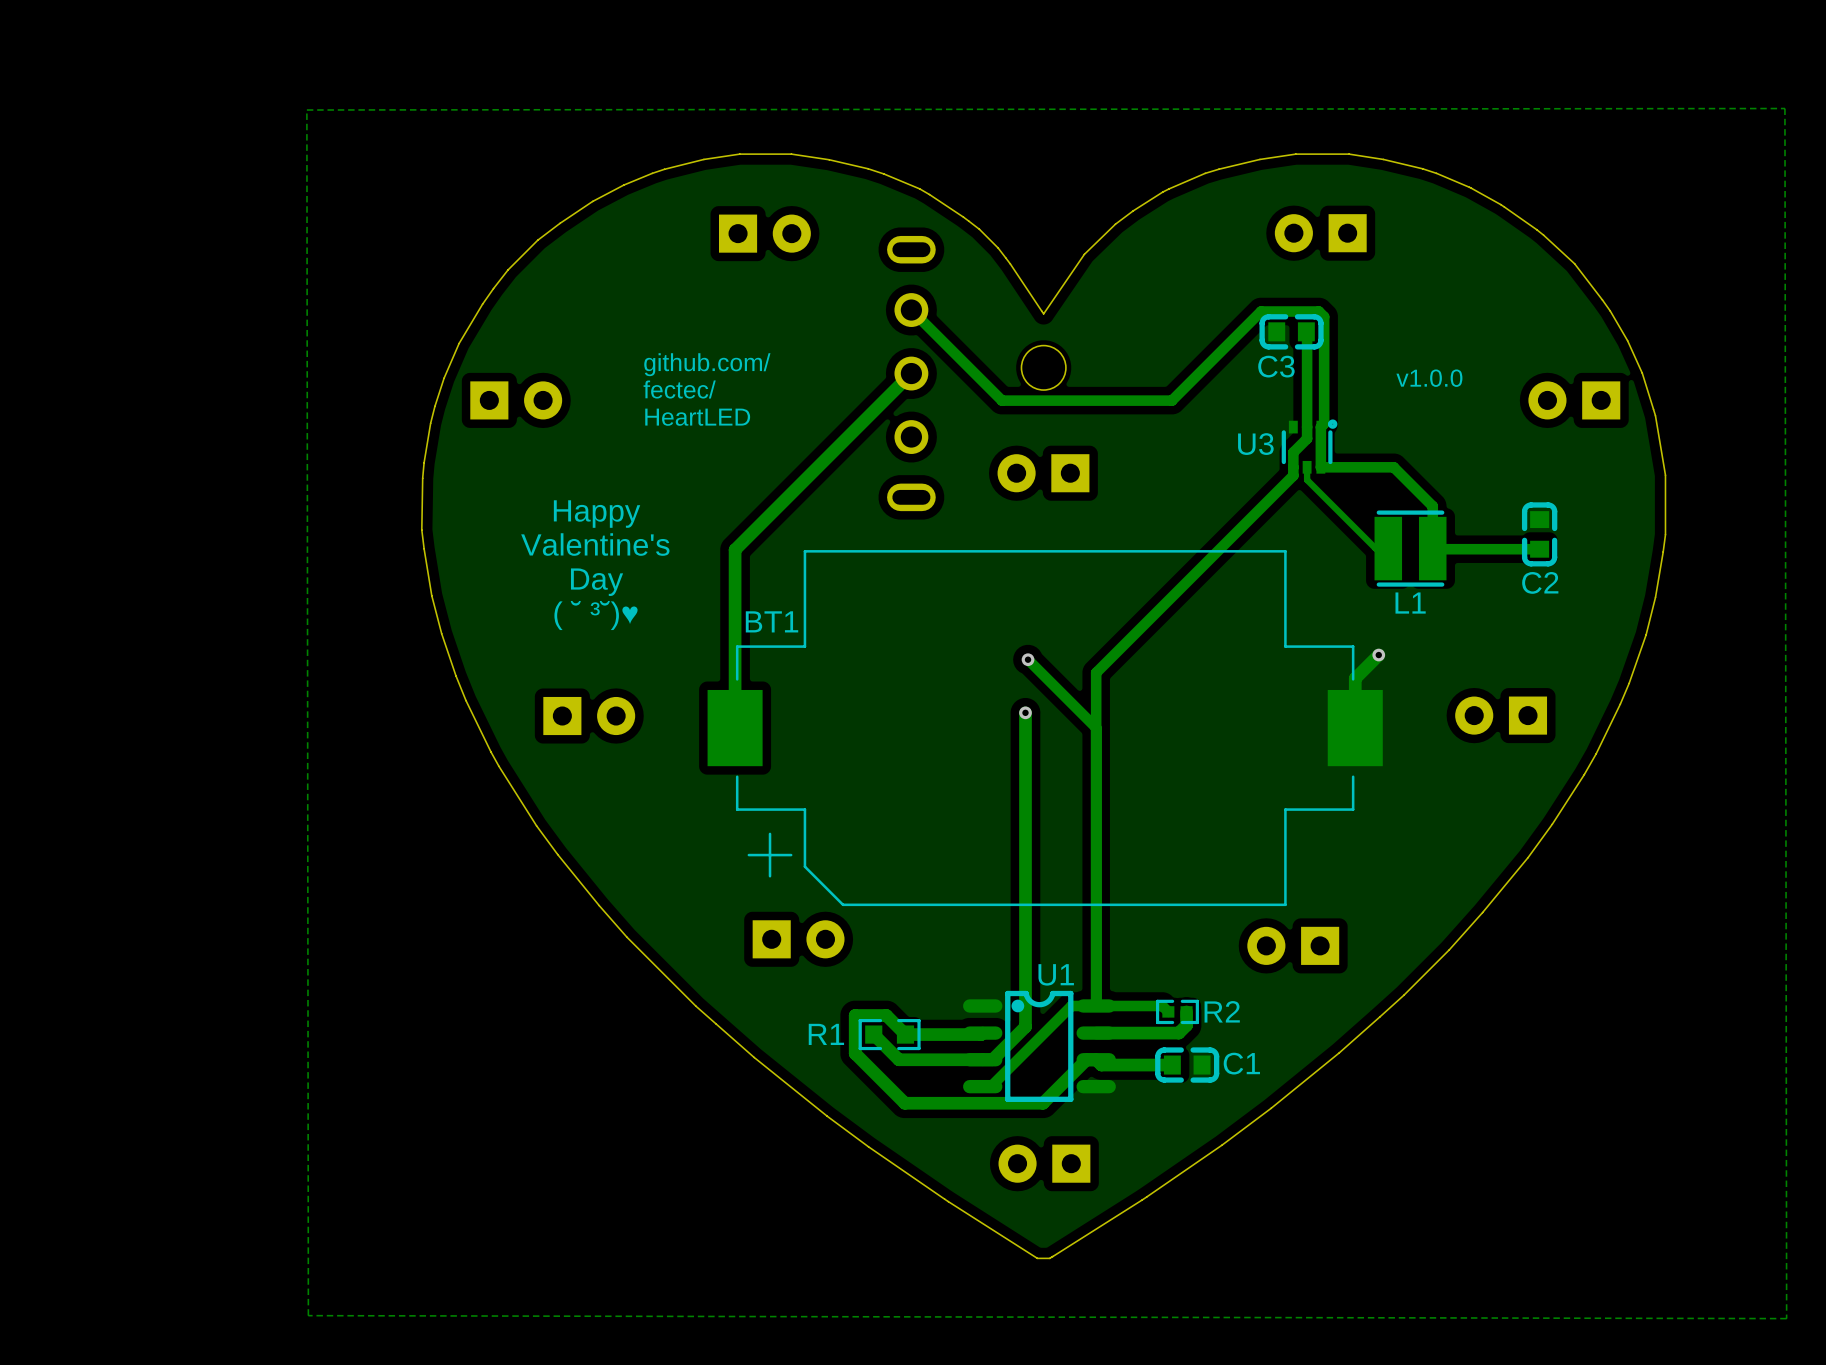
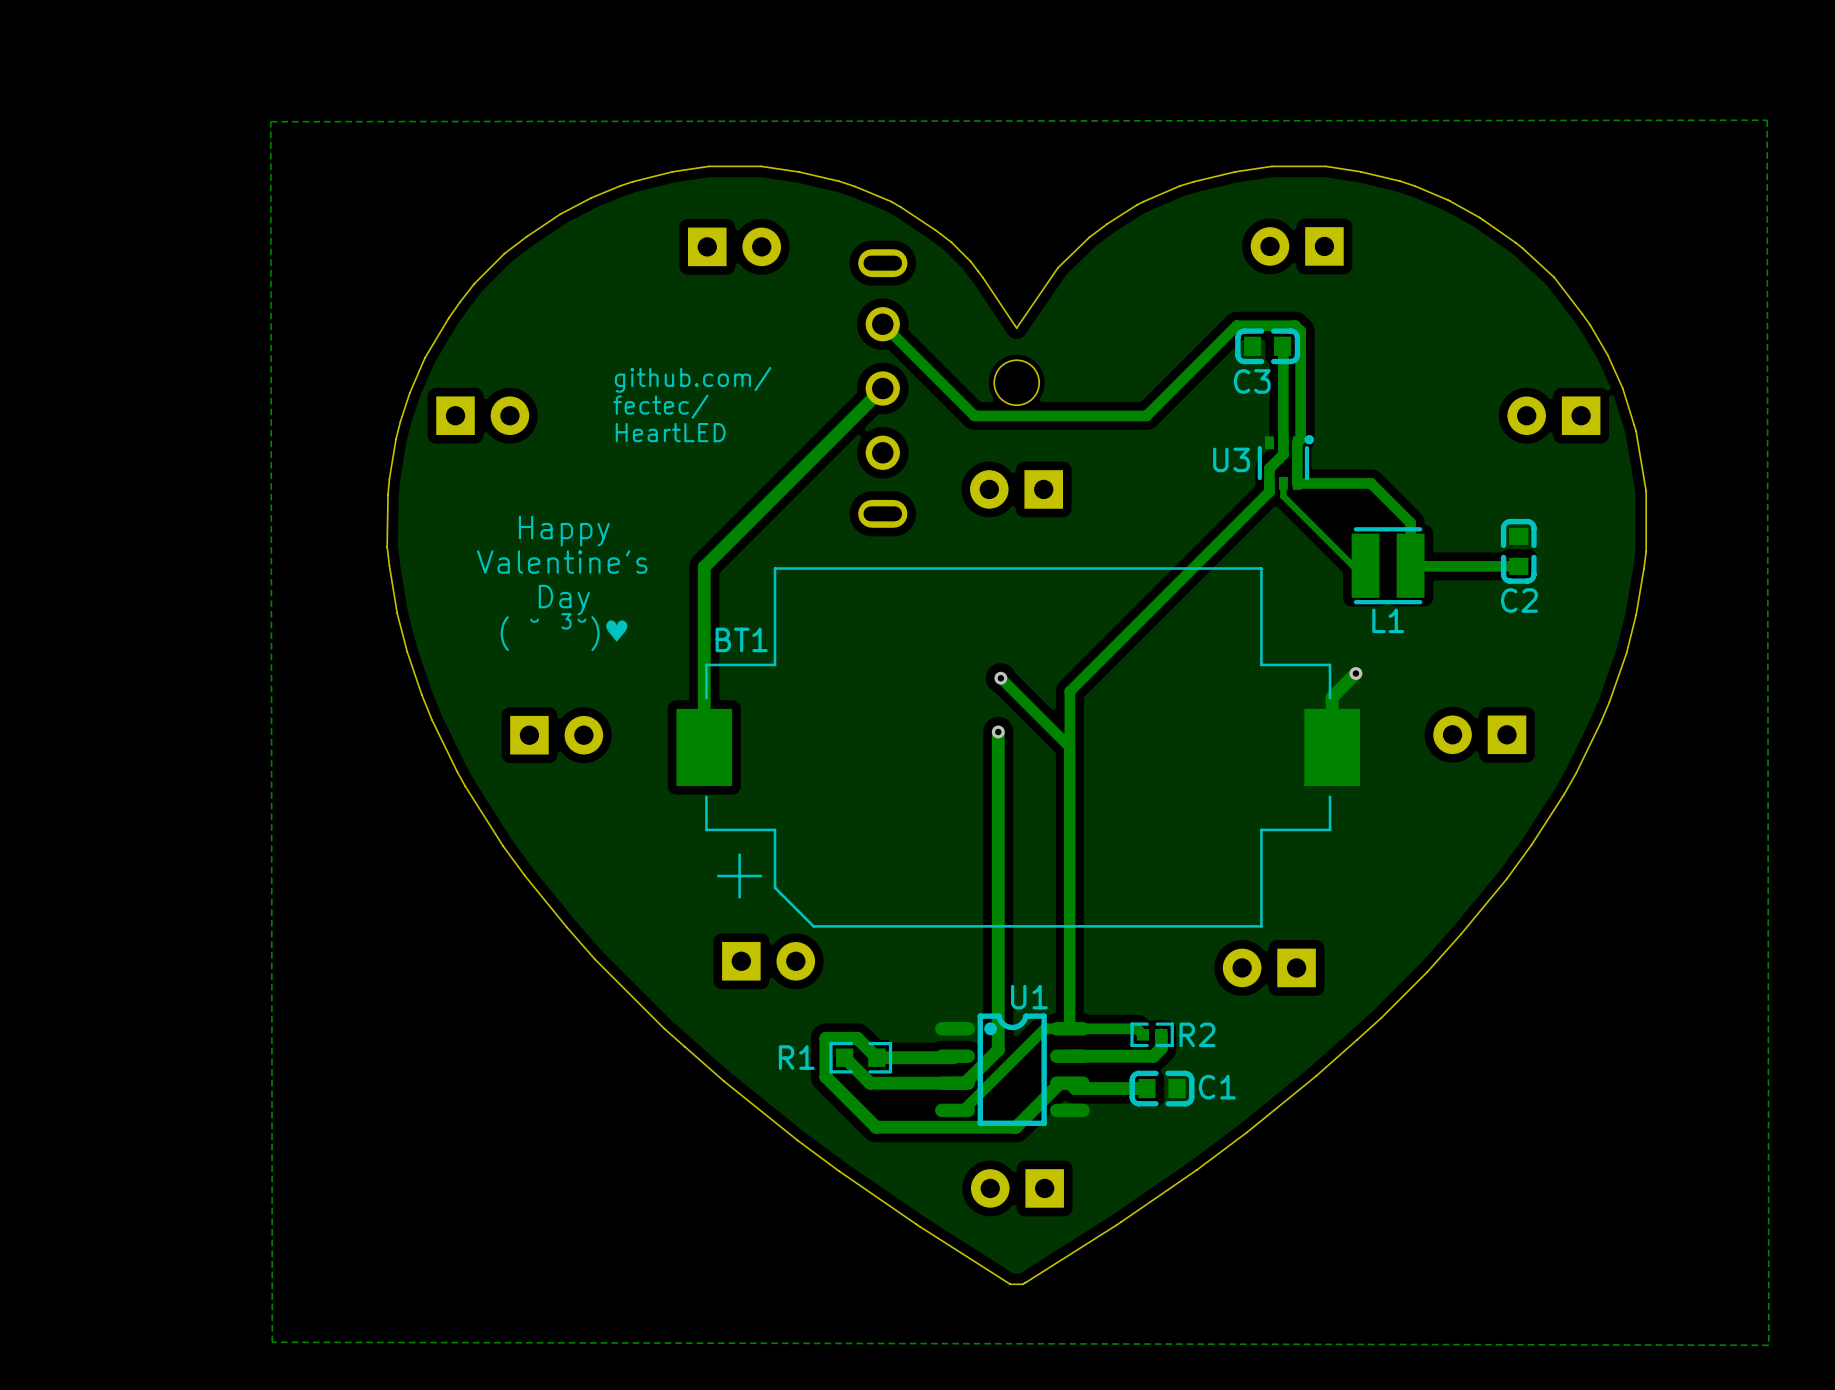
text: v1.0.0 (1429, 378) -> none

